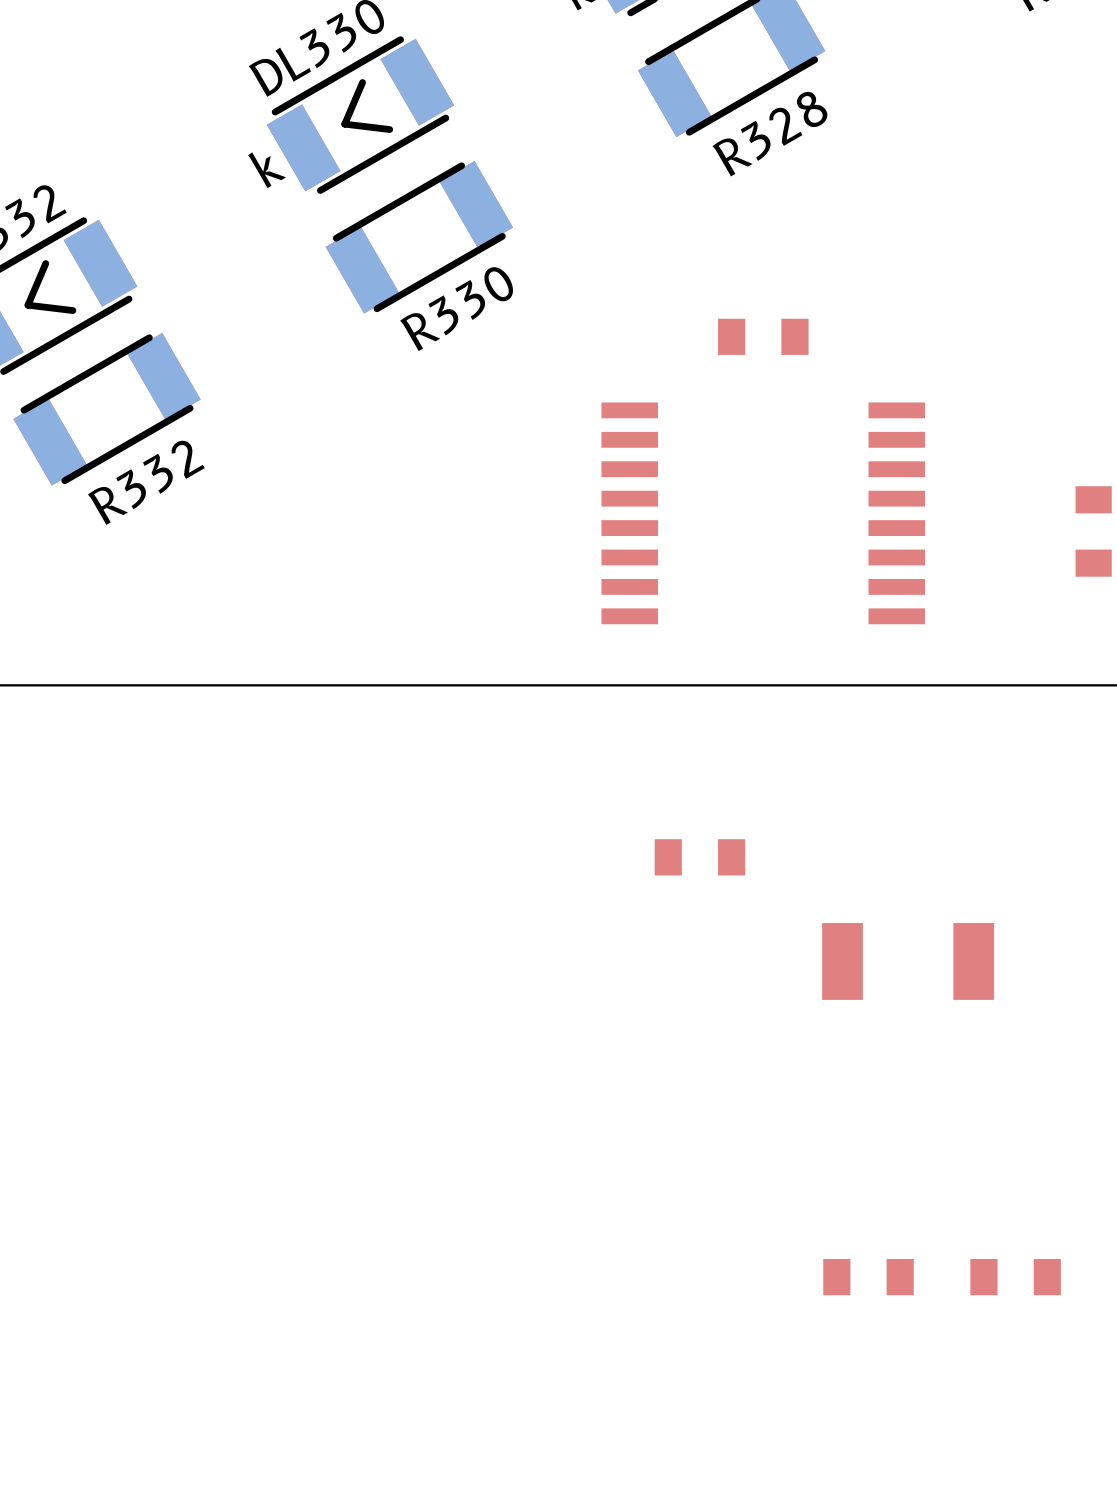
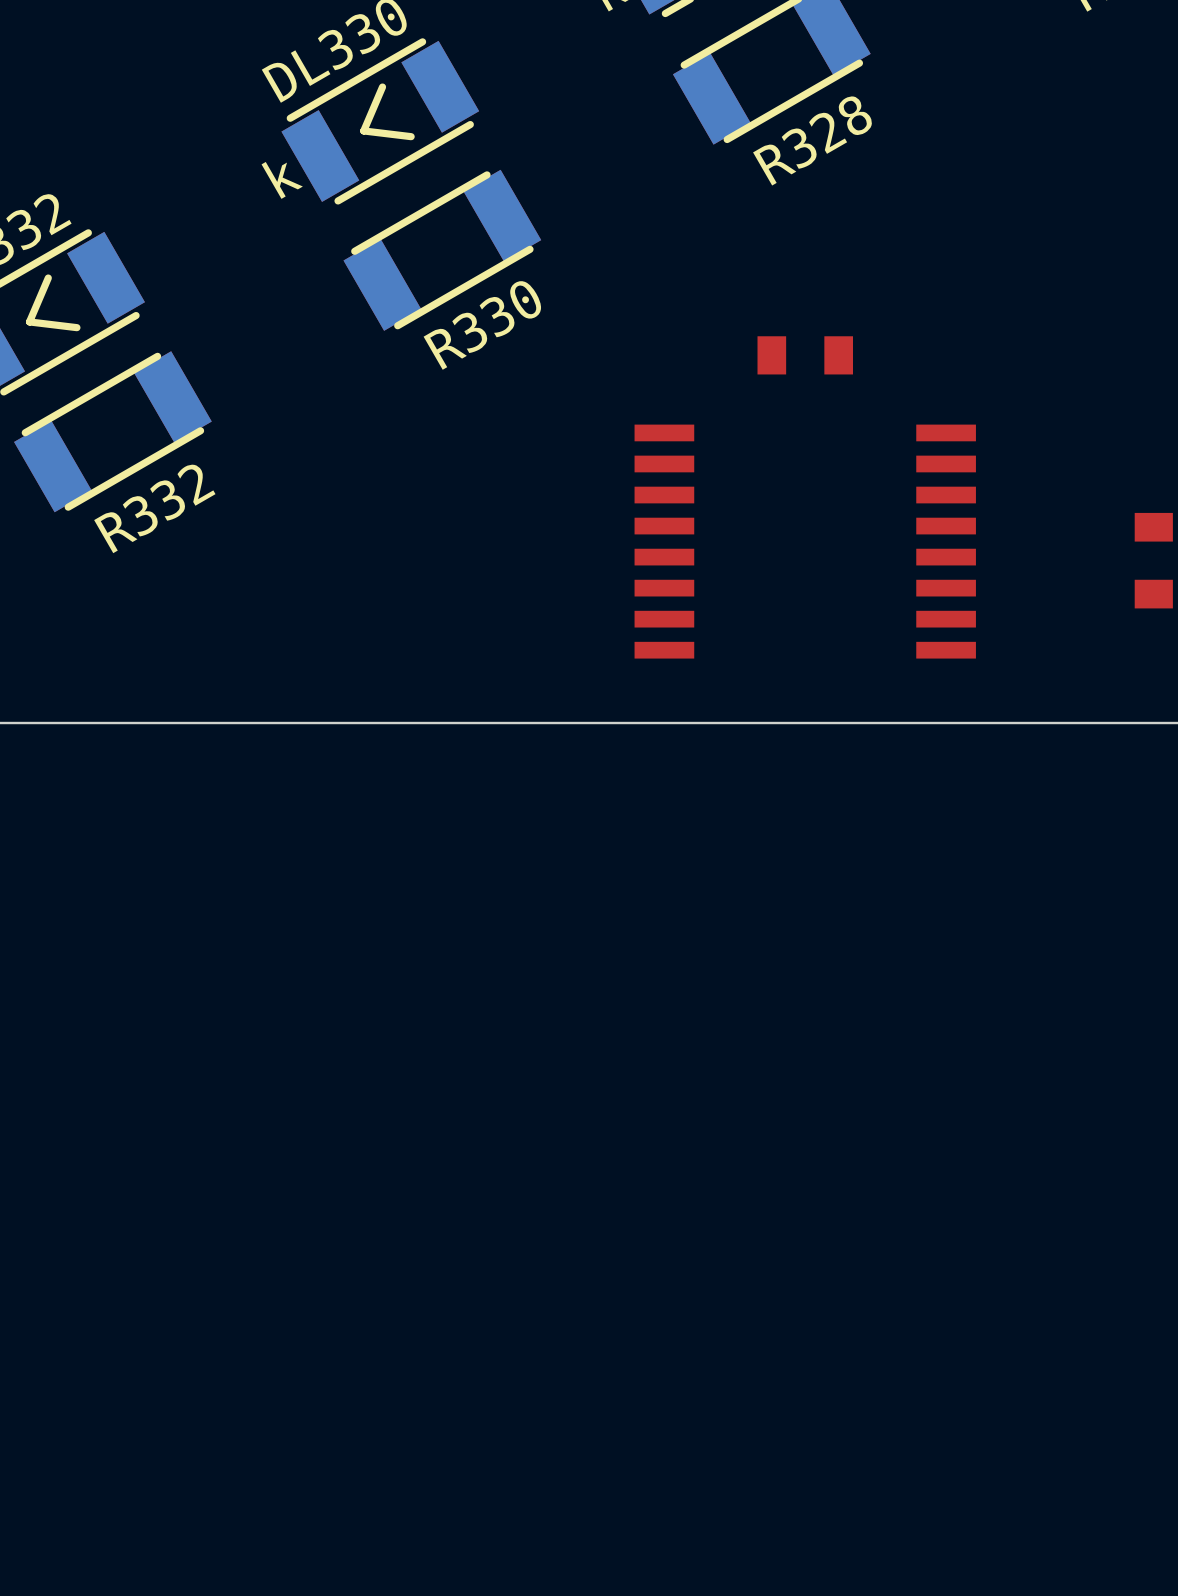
part: (699, 857) -> none
part: (908, 961) -> none
part: (868, 1277) -> none
part: (1015, 1277) -> none

